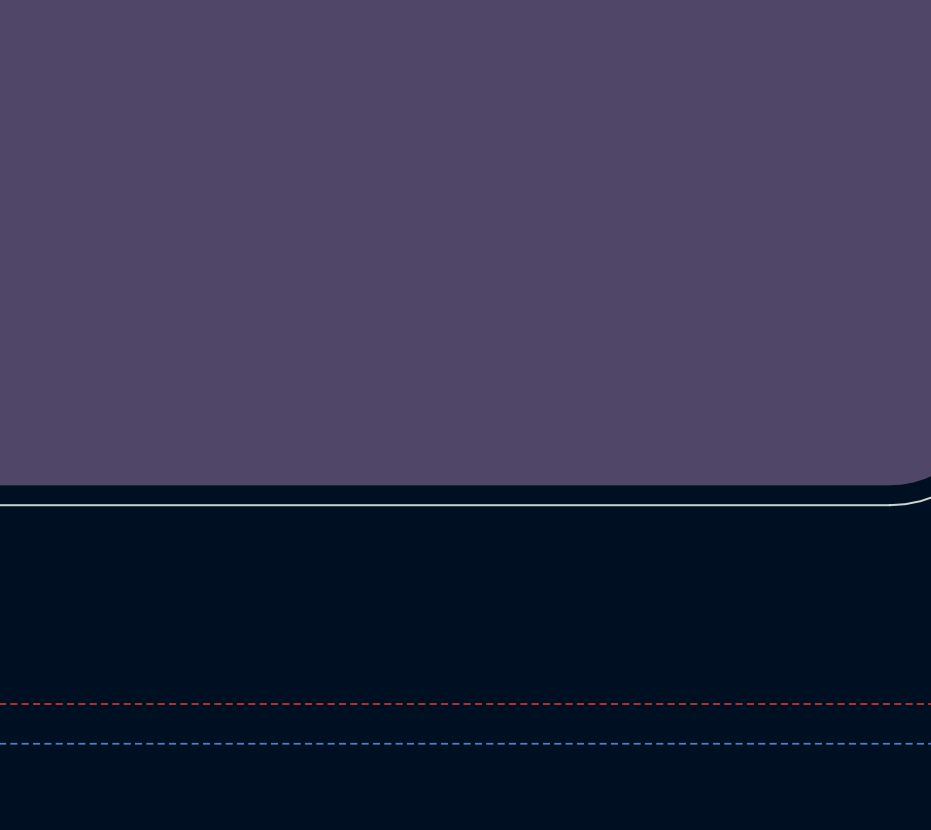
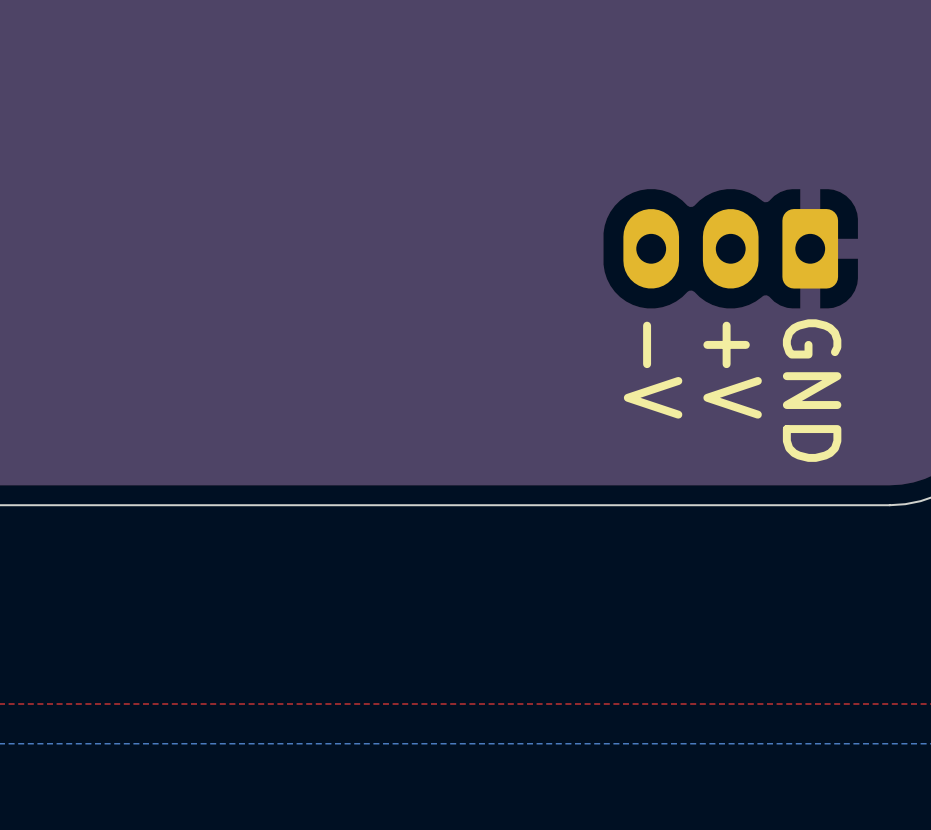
part: none -> (730, 248)

